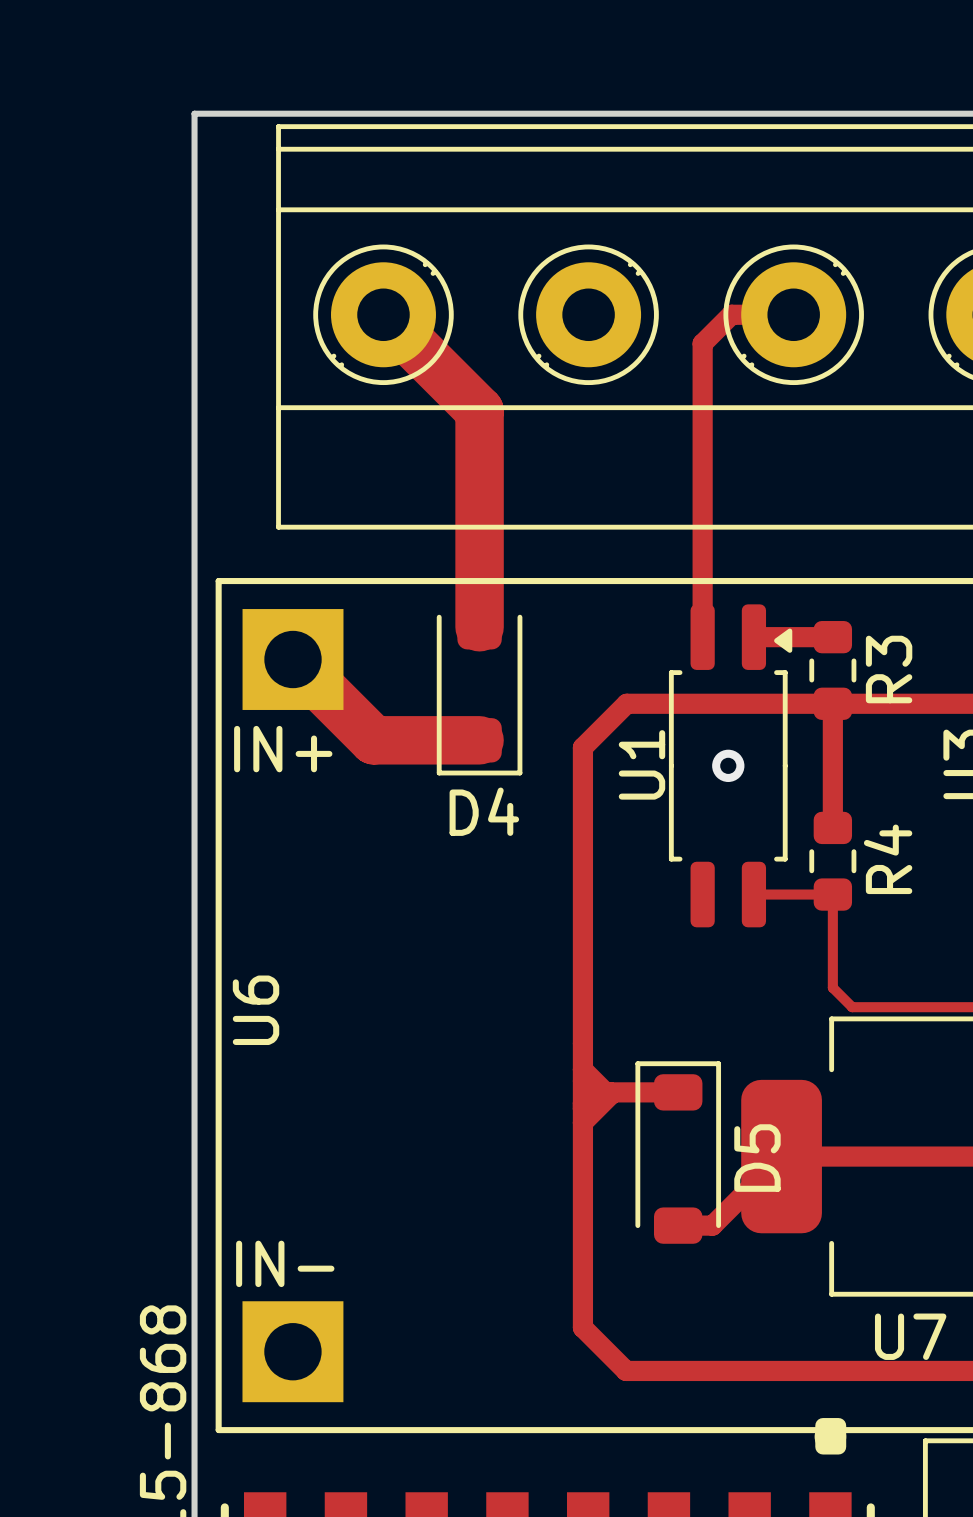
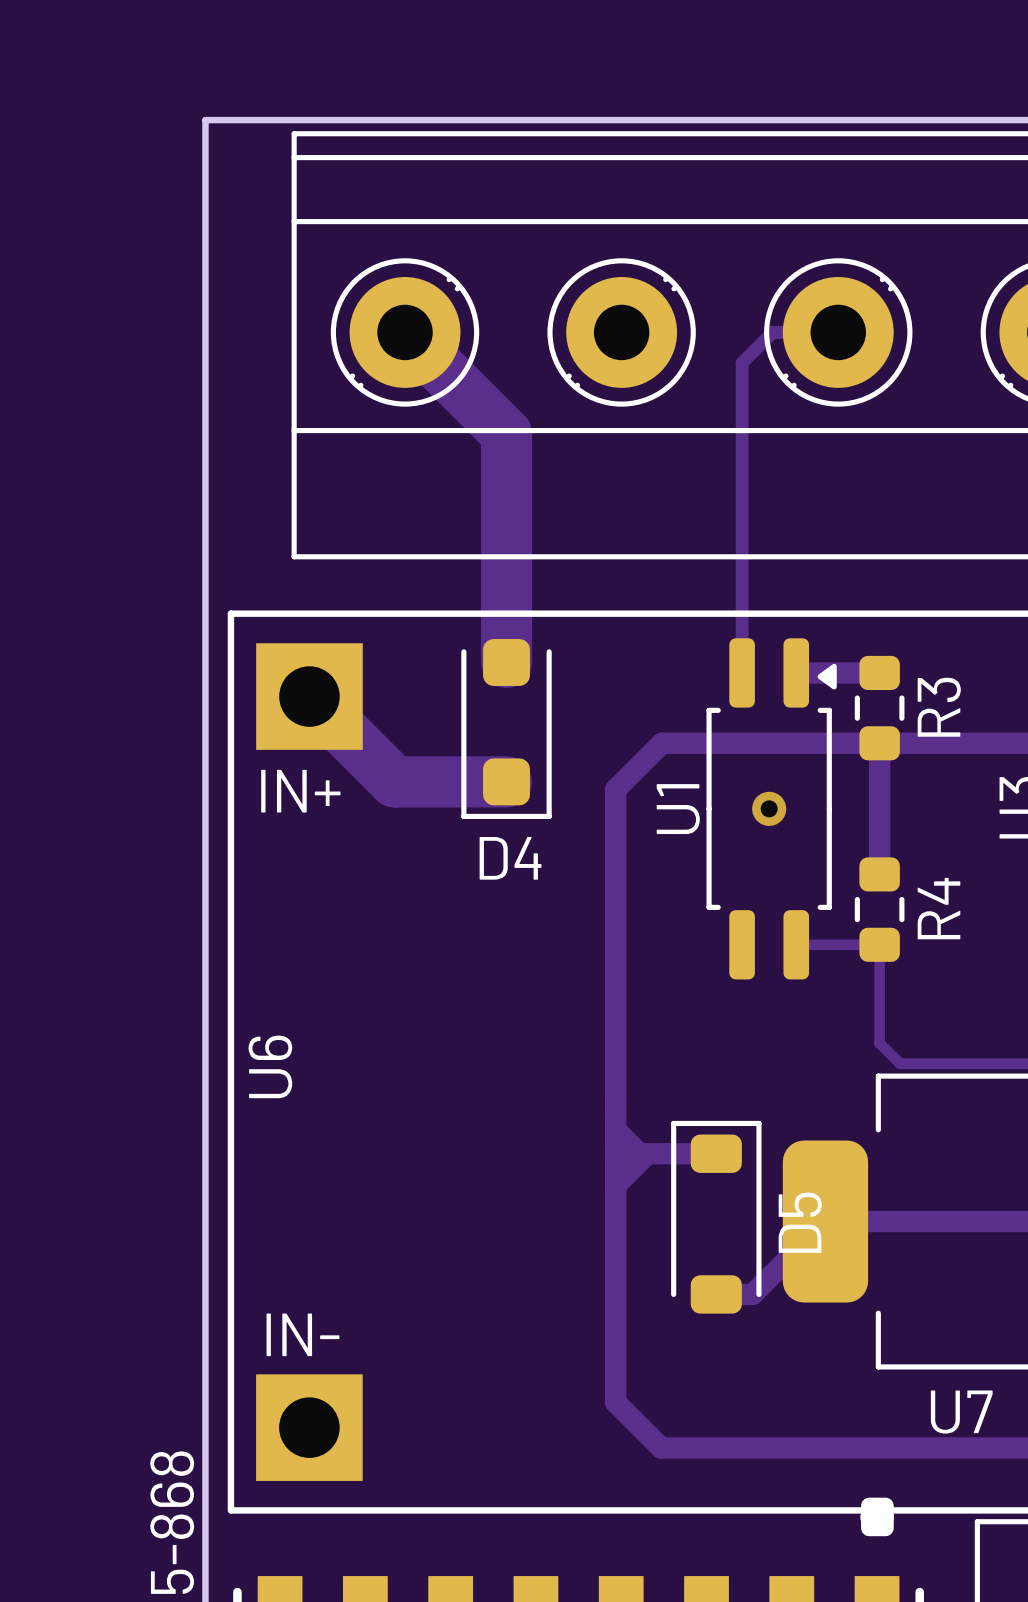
track width: thick (793, 314) (731, 314) (702, 343) (702, 637) -> thin (838, 332) (772, 332) (742, 362) (742, 672)

